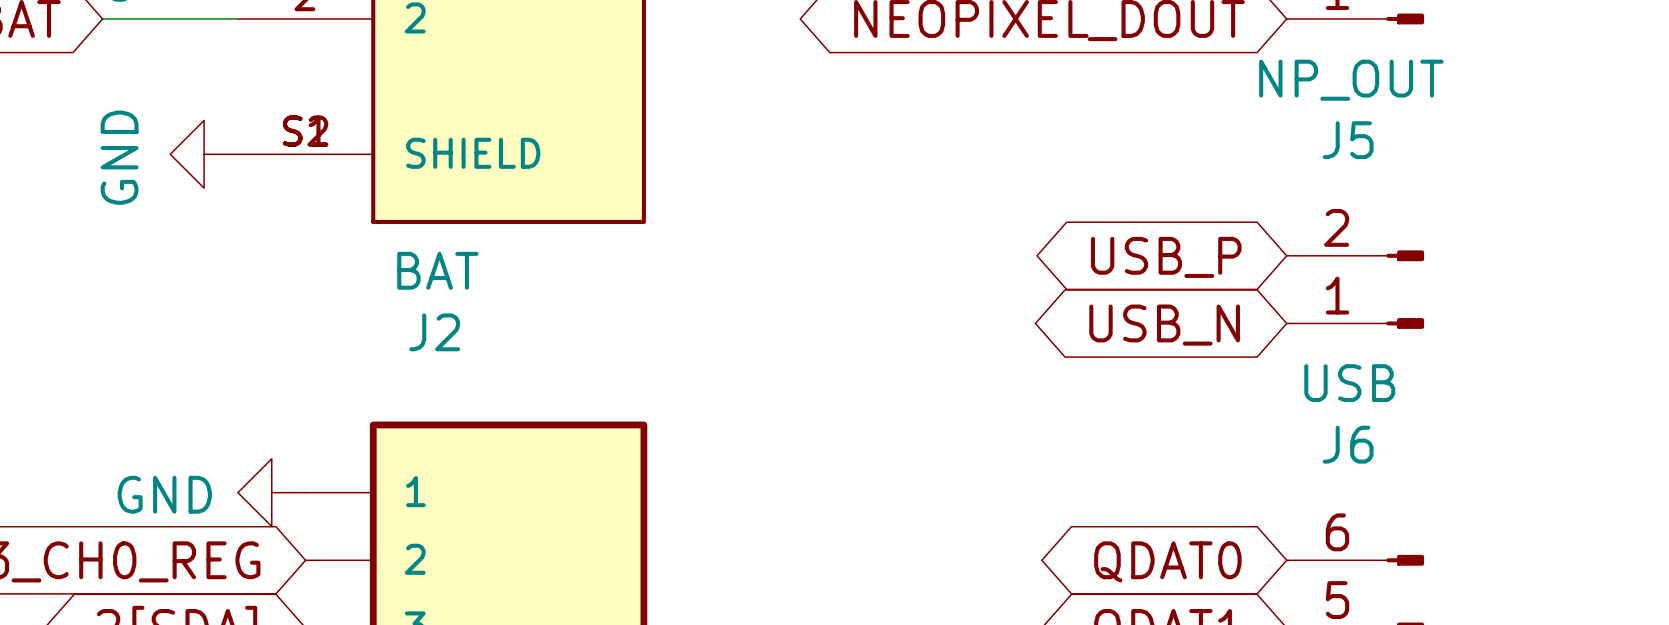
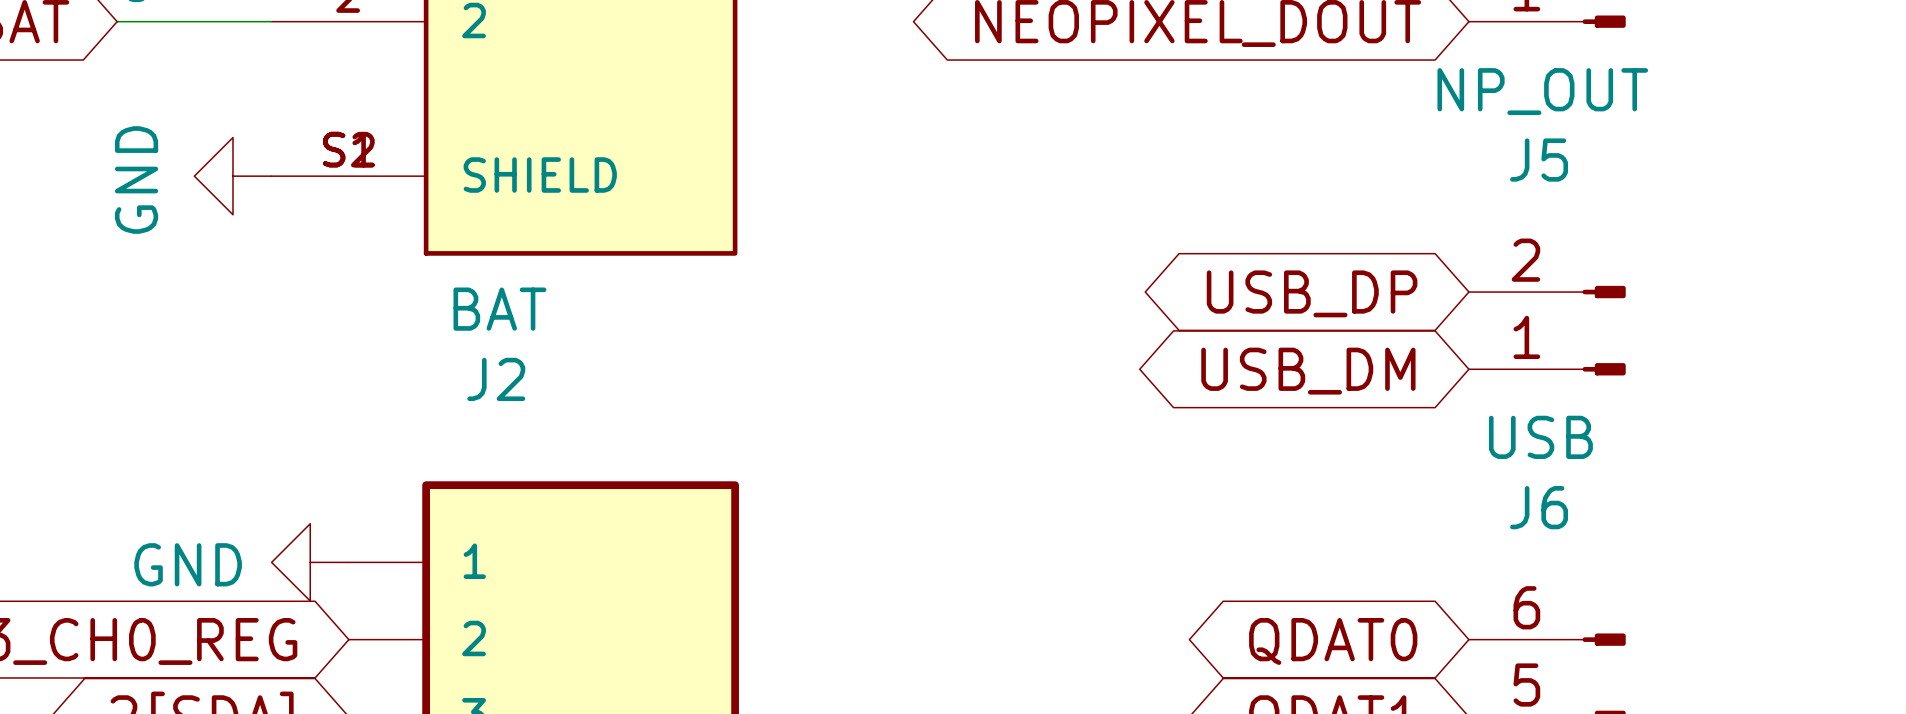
global label: USB_P (1166, 257) -> USB_DP (1312, 293)
global label: USB_N (1164, 325) -> USB_DM (1308, 371)

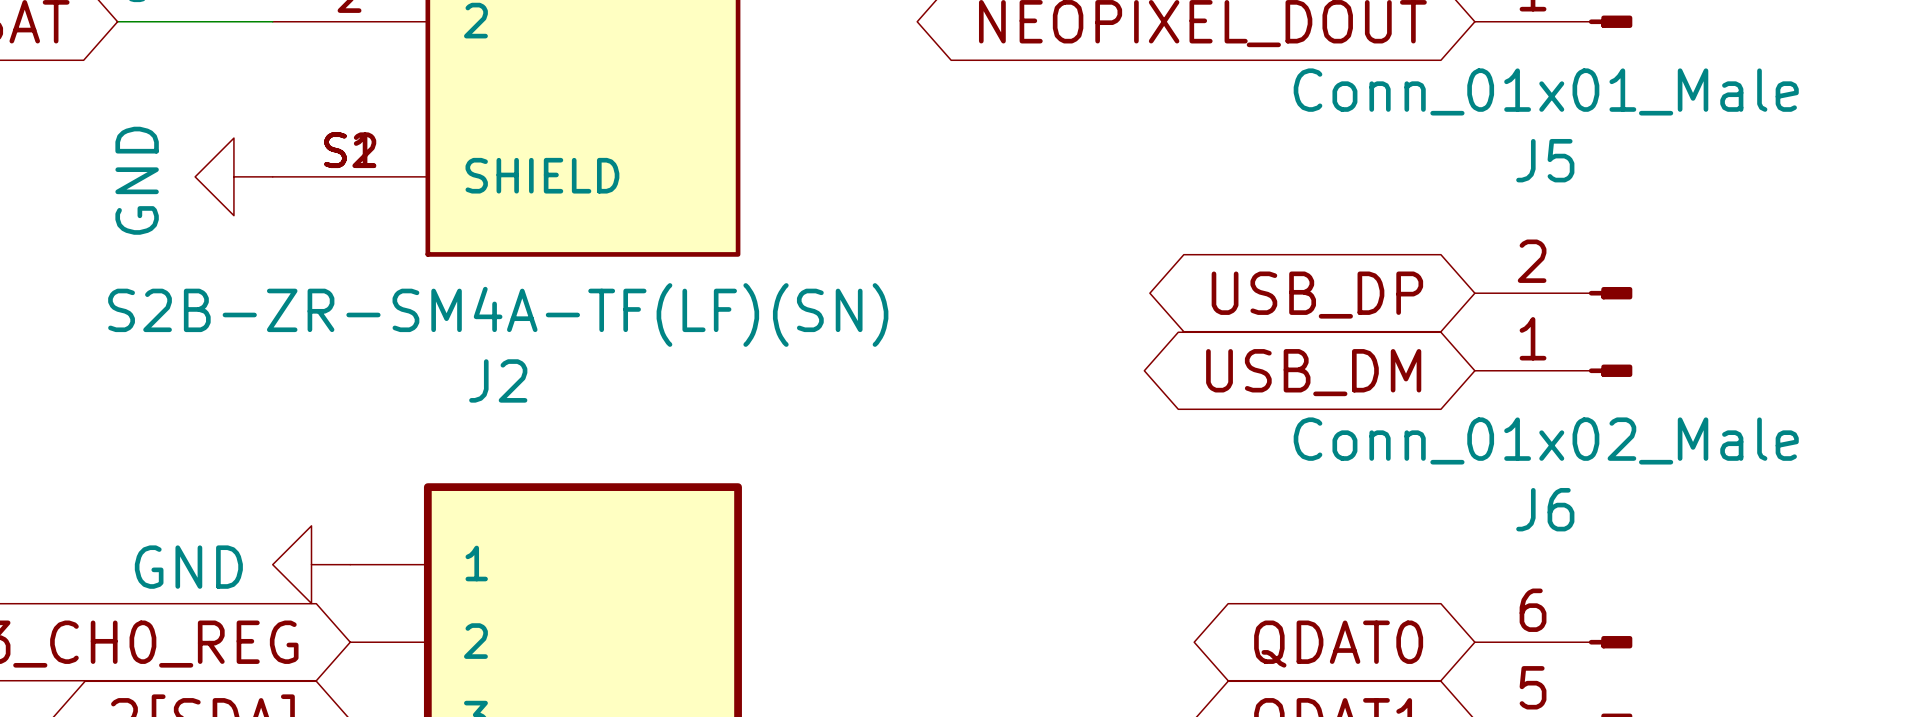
J5 value: NP_OUT (1542, 91) -> Conn_01x01_Male (1546, 91)
J2 value: BAT (499, 309) -> S2B-ZR-SM4A-TF(LF)(SN) (498, 314)
J6 value: USB (1540, 437) -> Conn_01x02_Male (1546, 440)

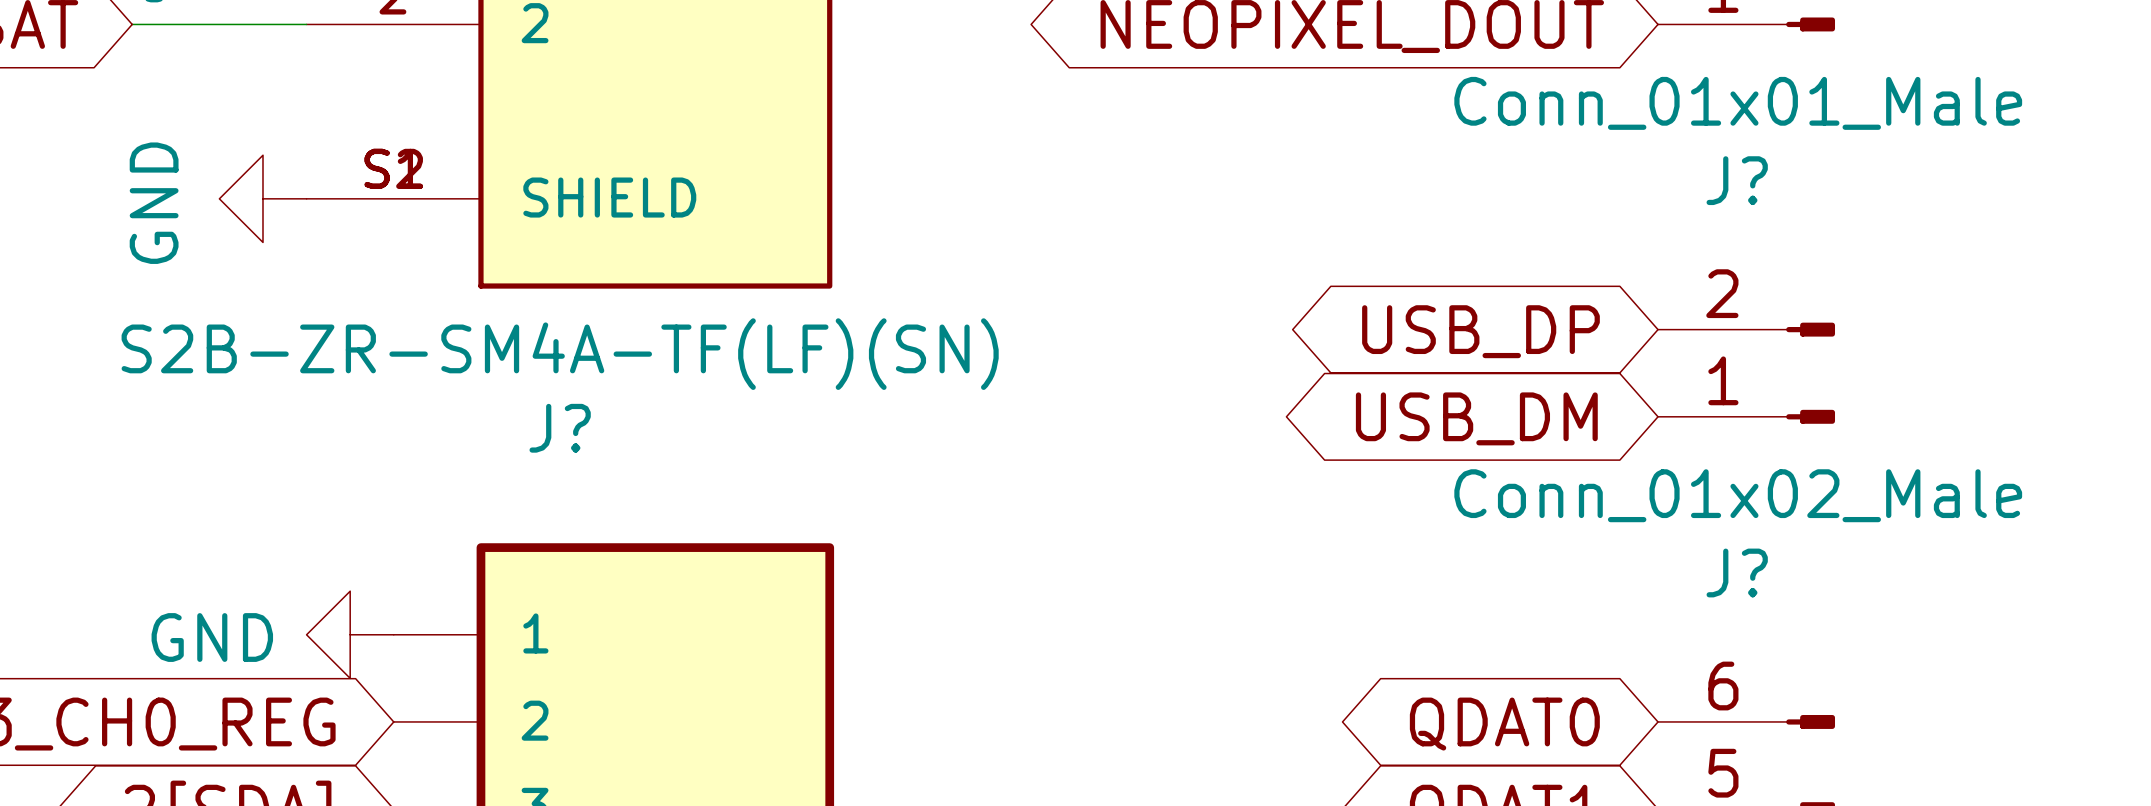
J5 name: J5 (1545, 160) -> J? (1737, 180)
J2 name: J2 (498, 380) -> J? (560, 428)
J6 name: J6 (1545, 509) -> J? (1737, 572)

